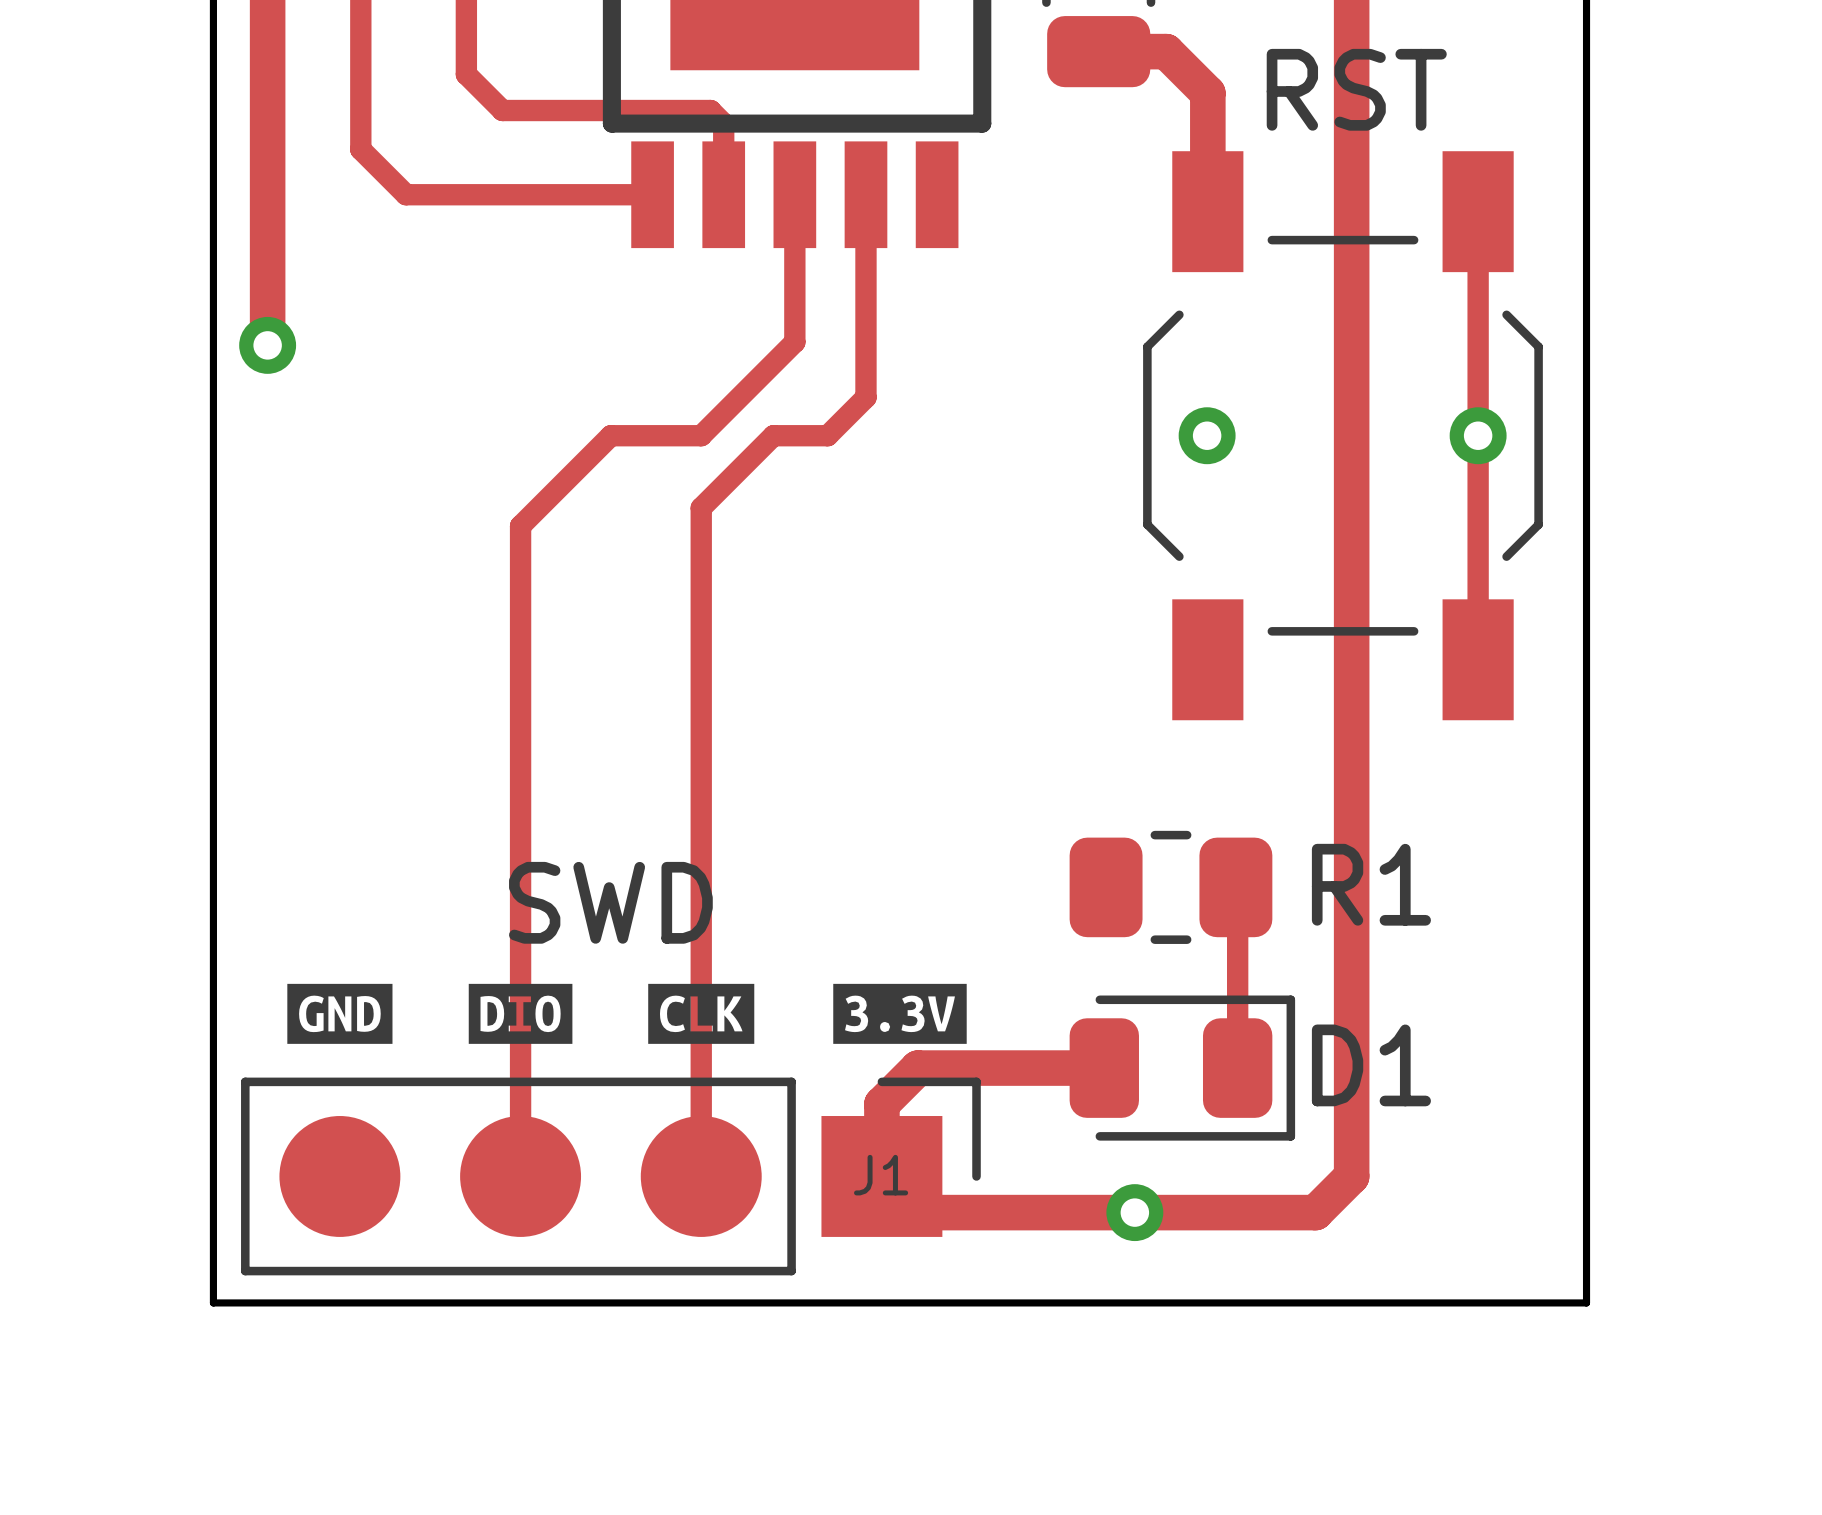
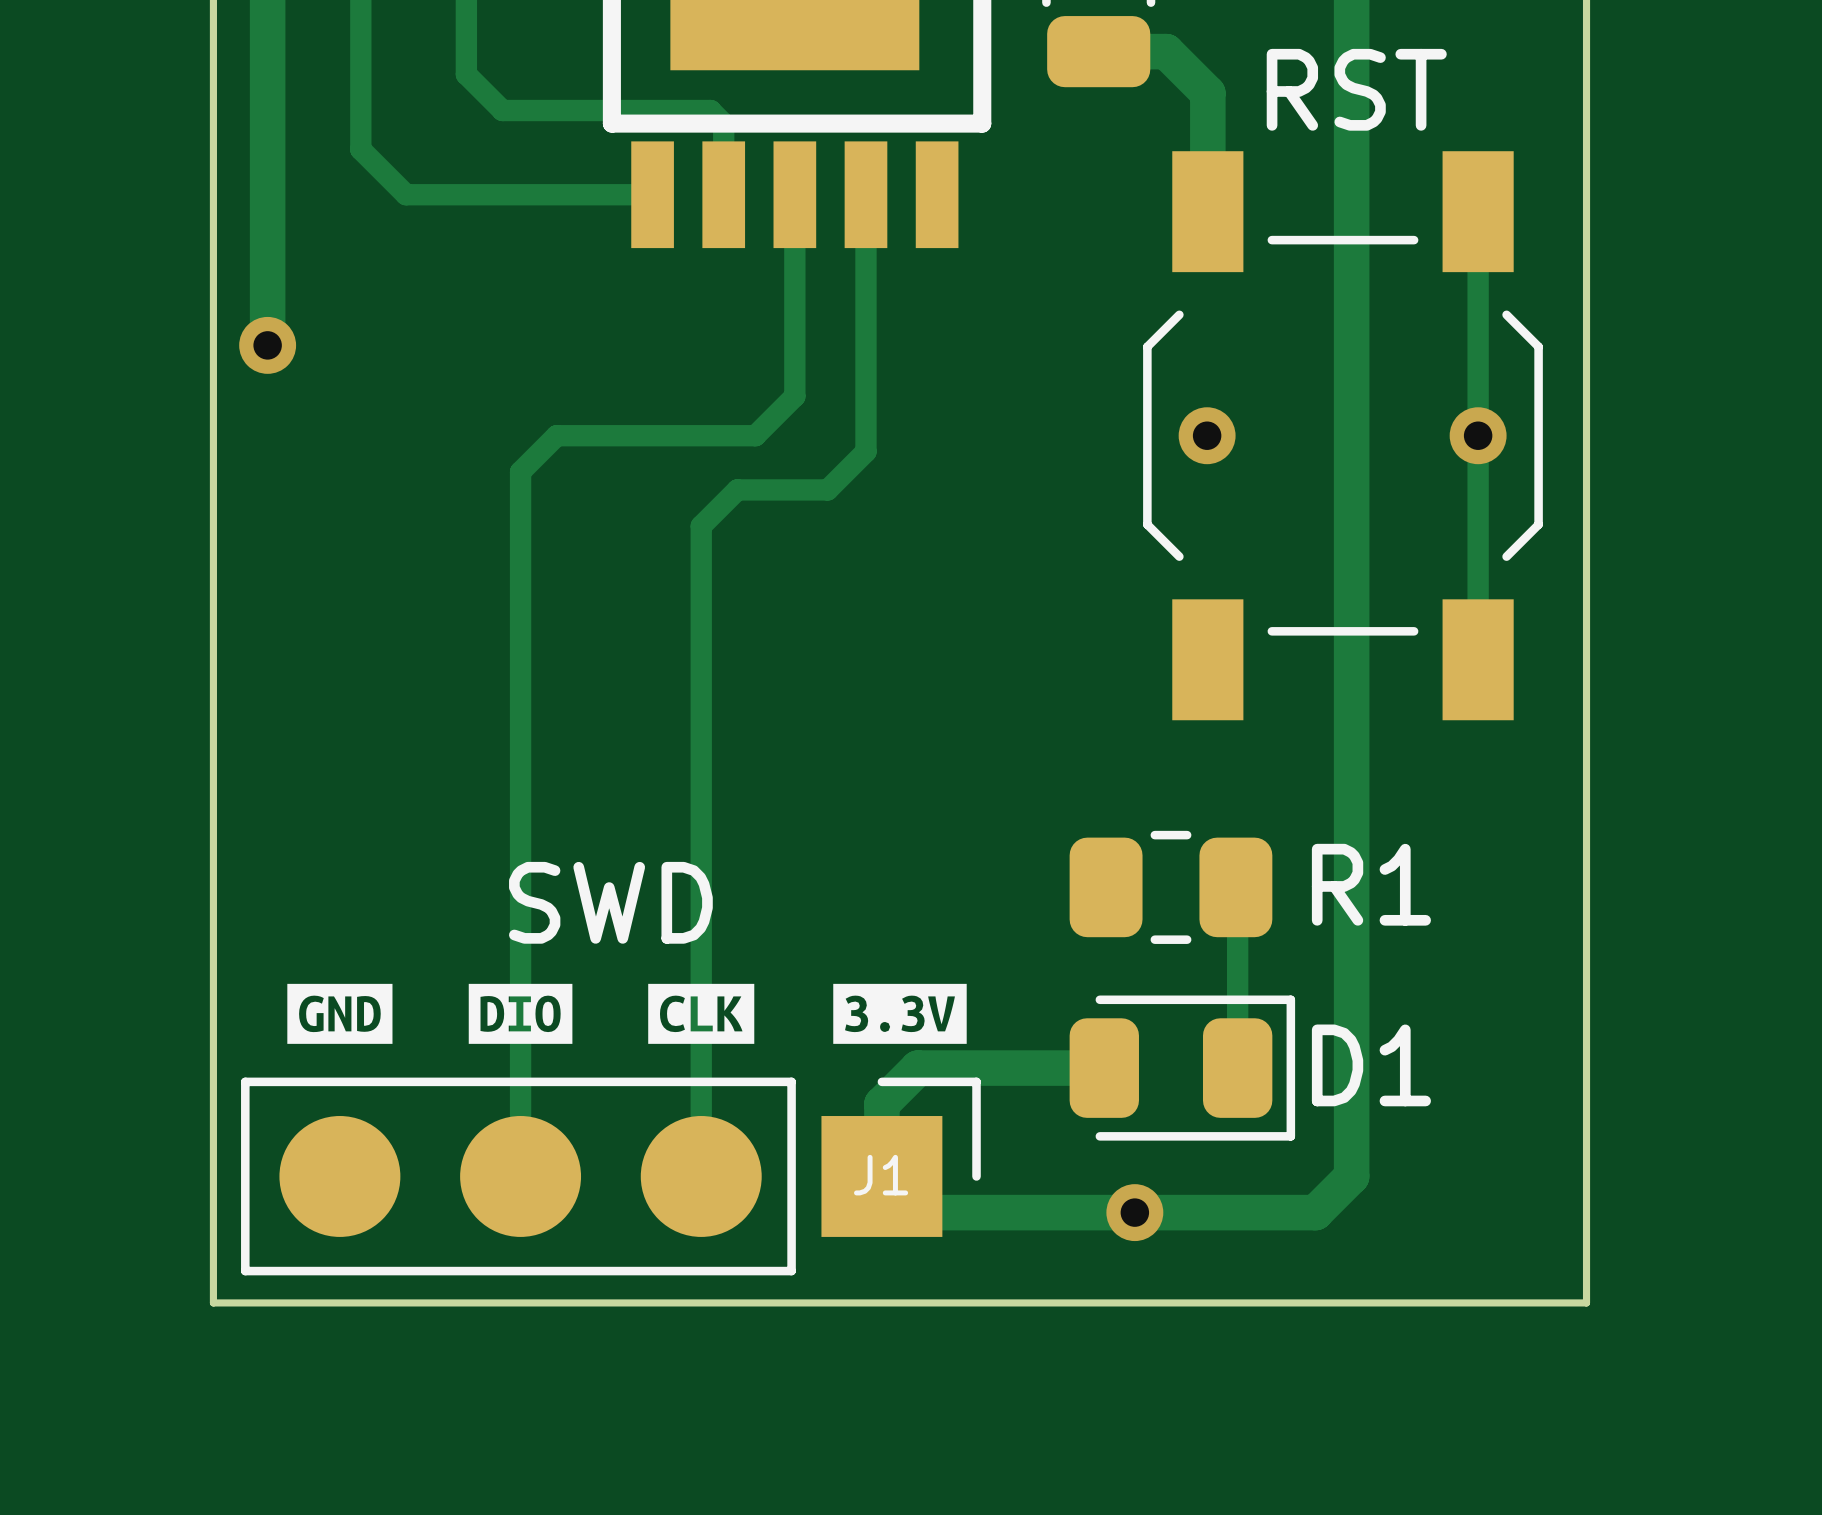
track: (794, 342) (701, 435) -> (794, 342) (794, 396) (755, 435) (701, 435)
track: (865, 397) (827, 435) (773, 435) (701, 507) (701, 526) -> (865, 397) (865, 451) (827, 489) (737, 489) (701, 526)
track: (610, 435) (520, 526) -> (610, 435) (556, 435) (520, 471) (520, 526)

